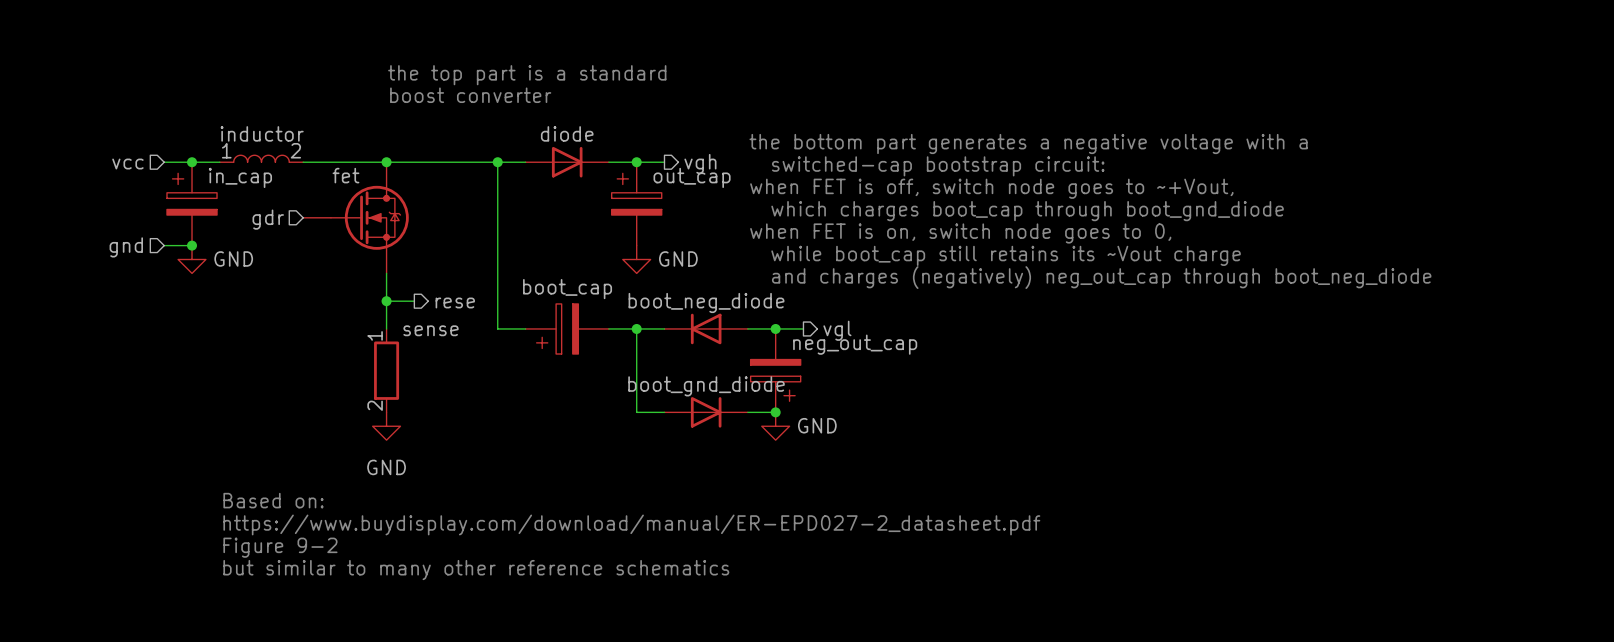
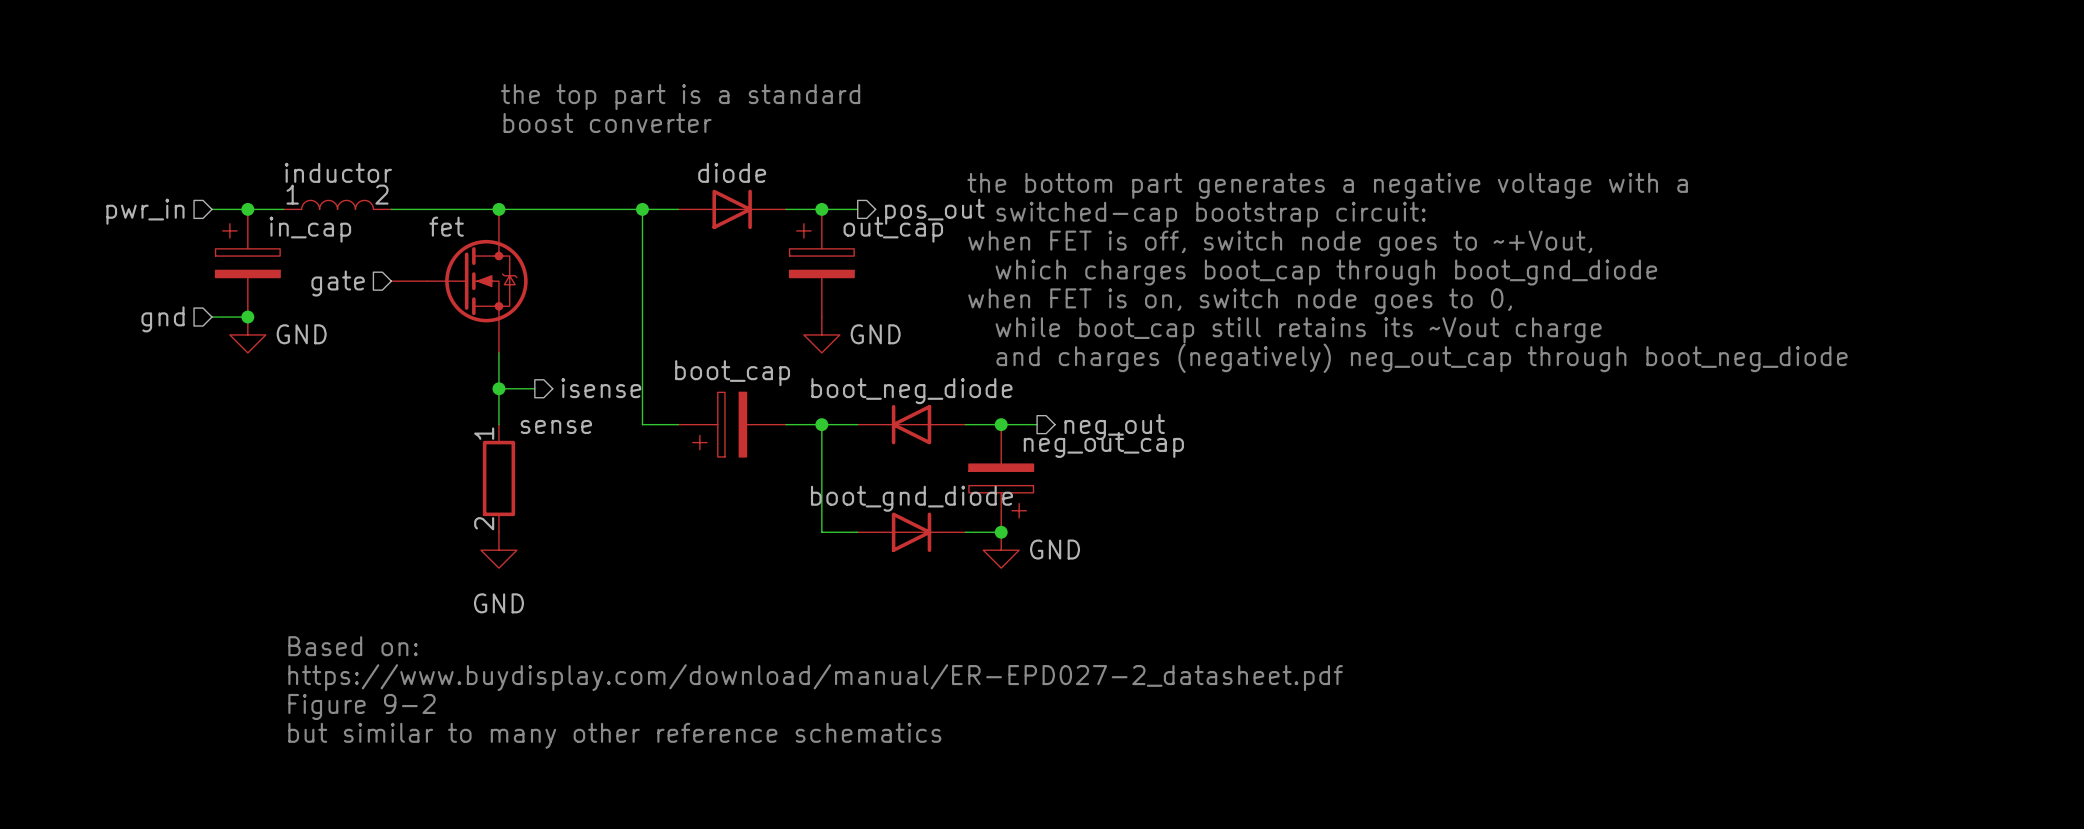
hierarchical label: vcc (127, 164) -> pwr_in (145, 211)
hierarchical label: vgh (700, 164) -> pos_out (934, 211)
hierarchical label: gdr (268, 219) -> gate (338, 283)
hierarchical label: rese (455, 302) -> isense (601, 388)
hierarchical label: vgl (837, 330) -> neg_out (1114, 426)

